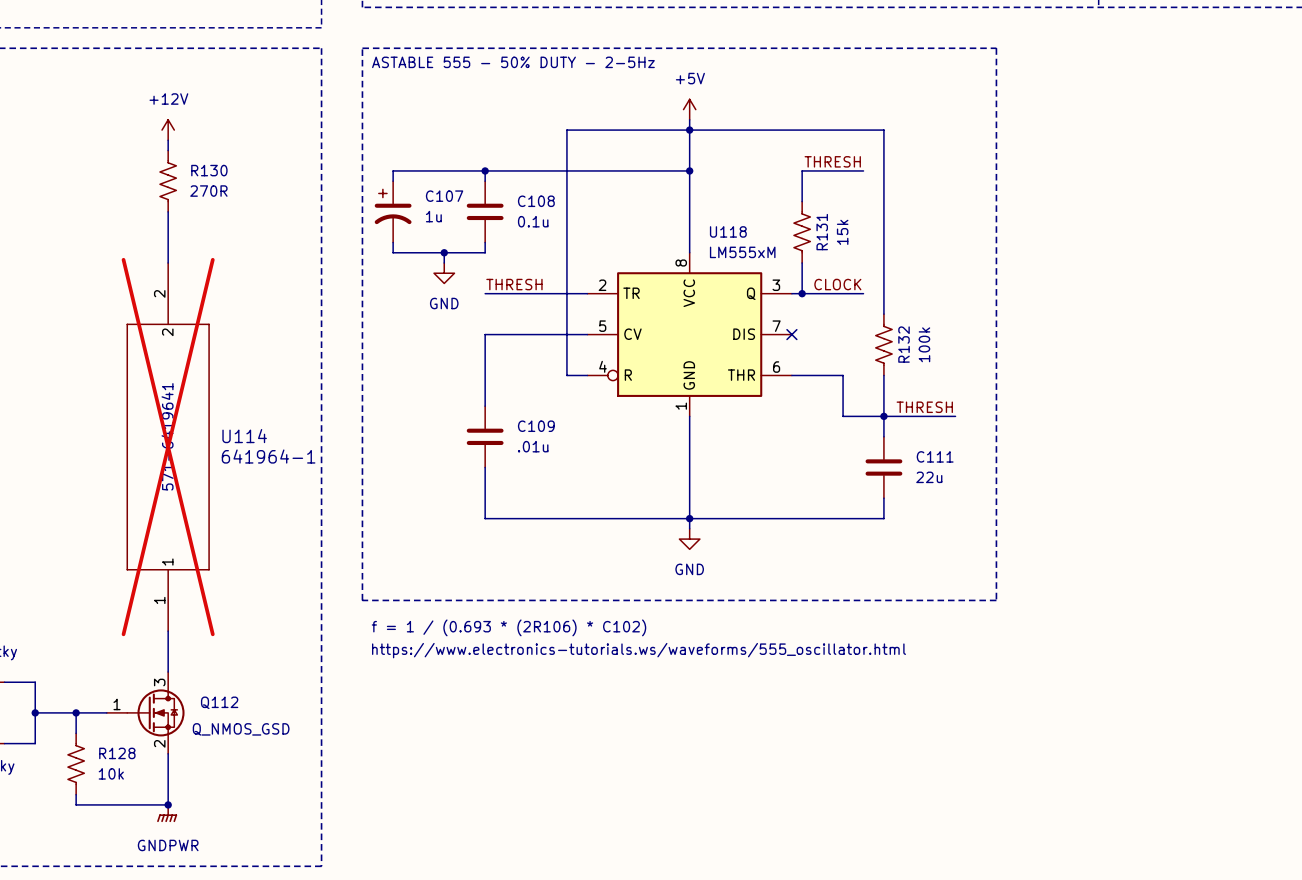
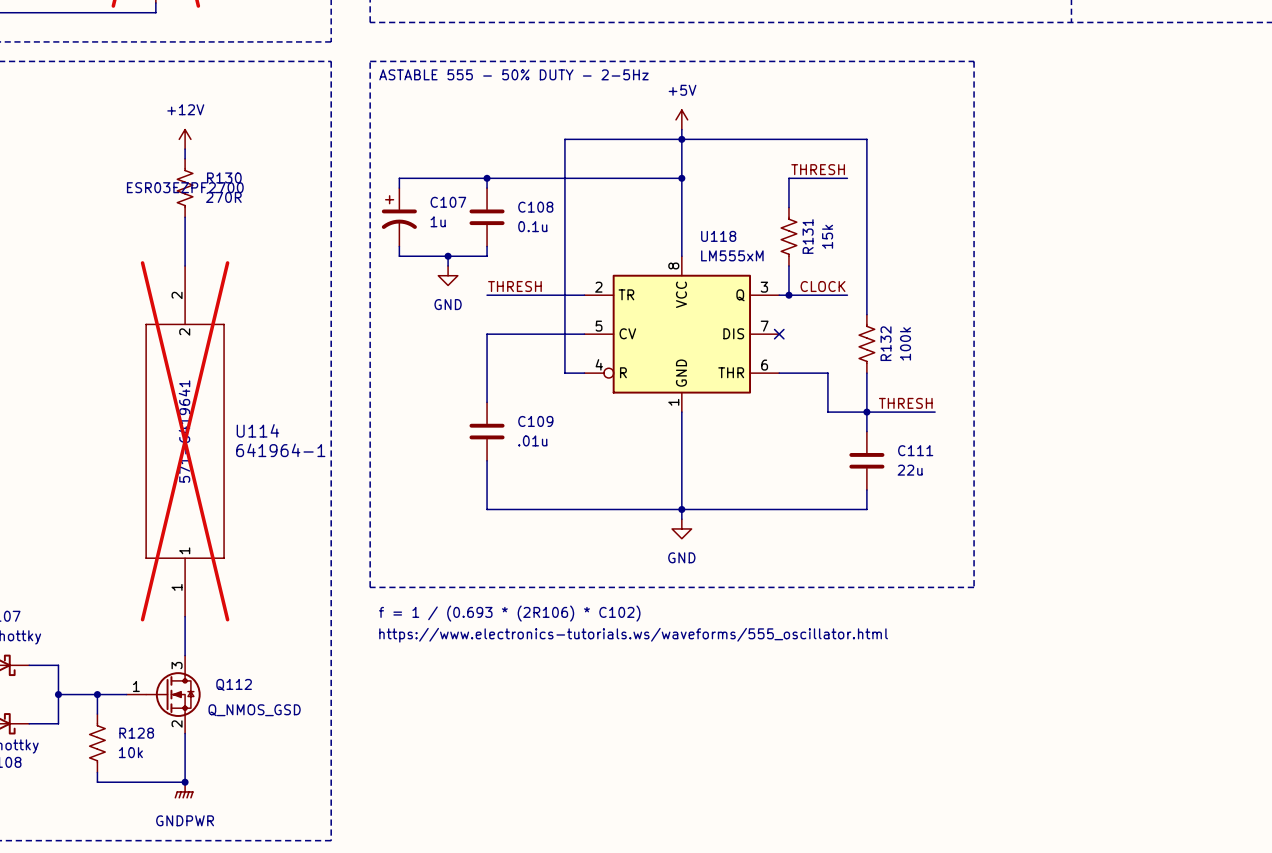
R130 text: none -> ESR03EZPF2700 (185, 187)

